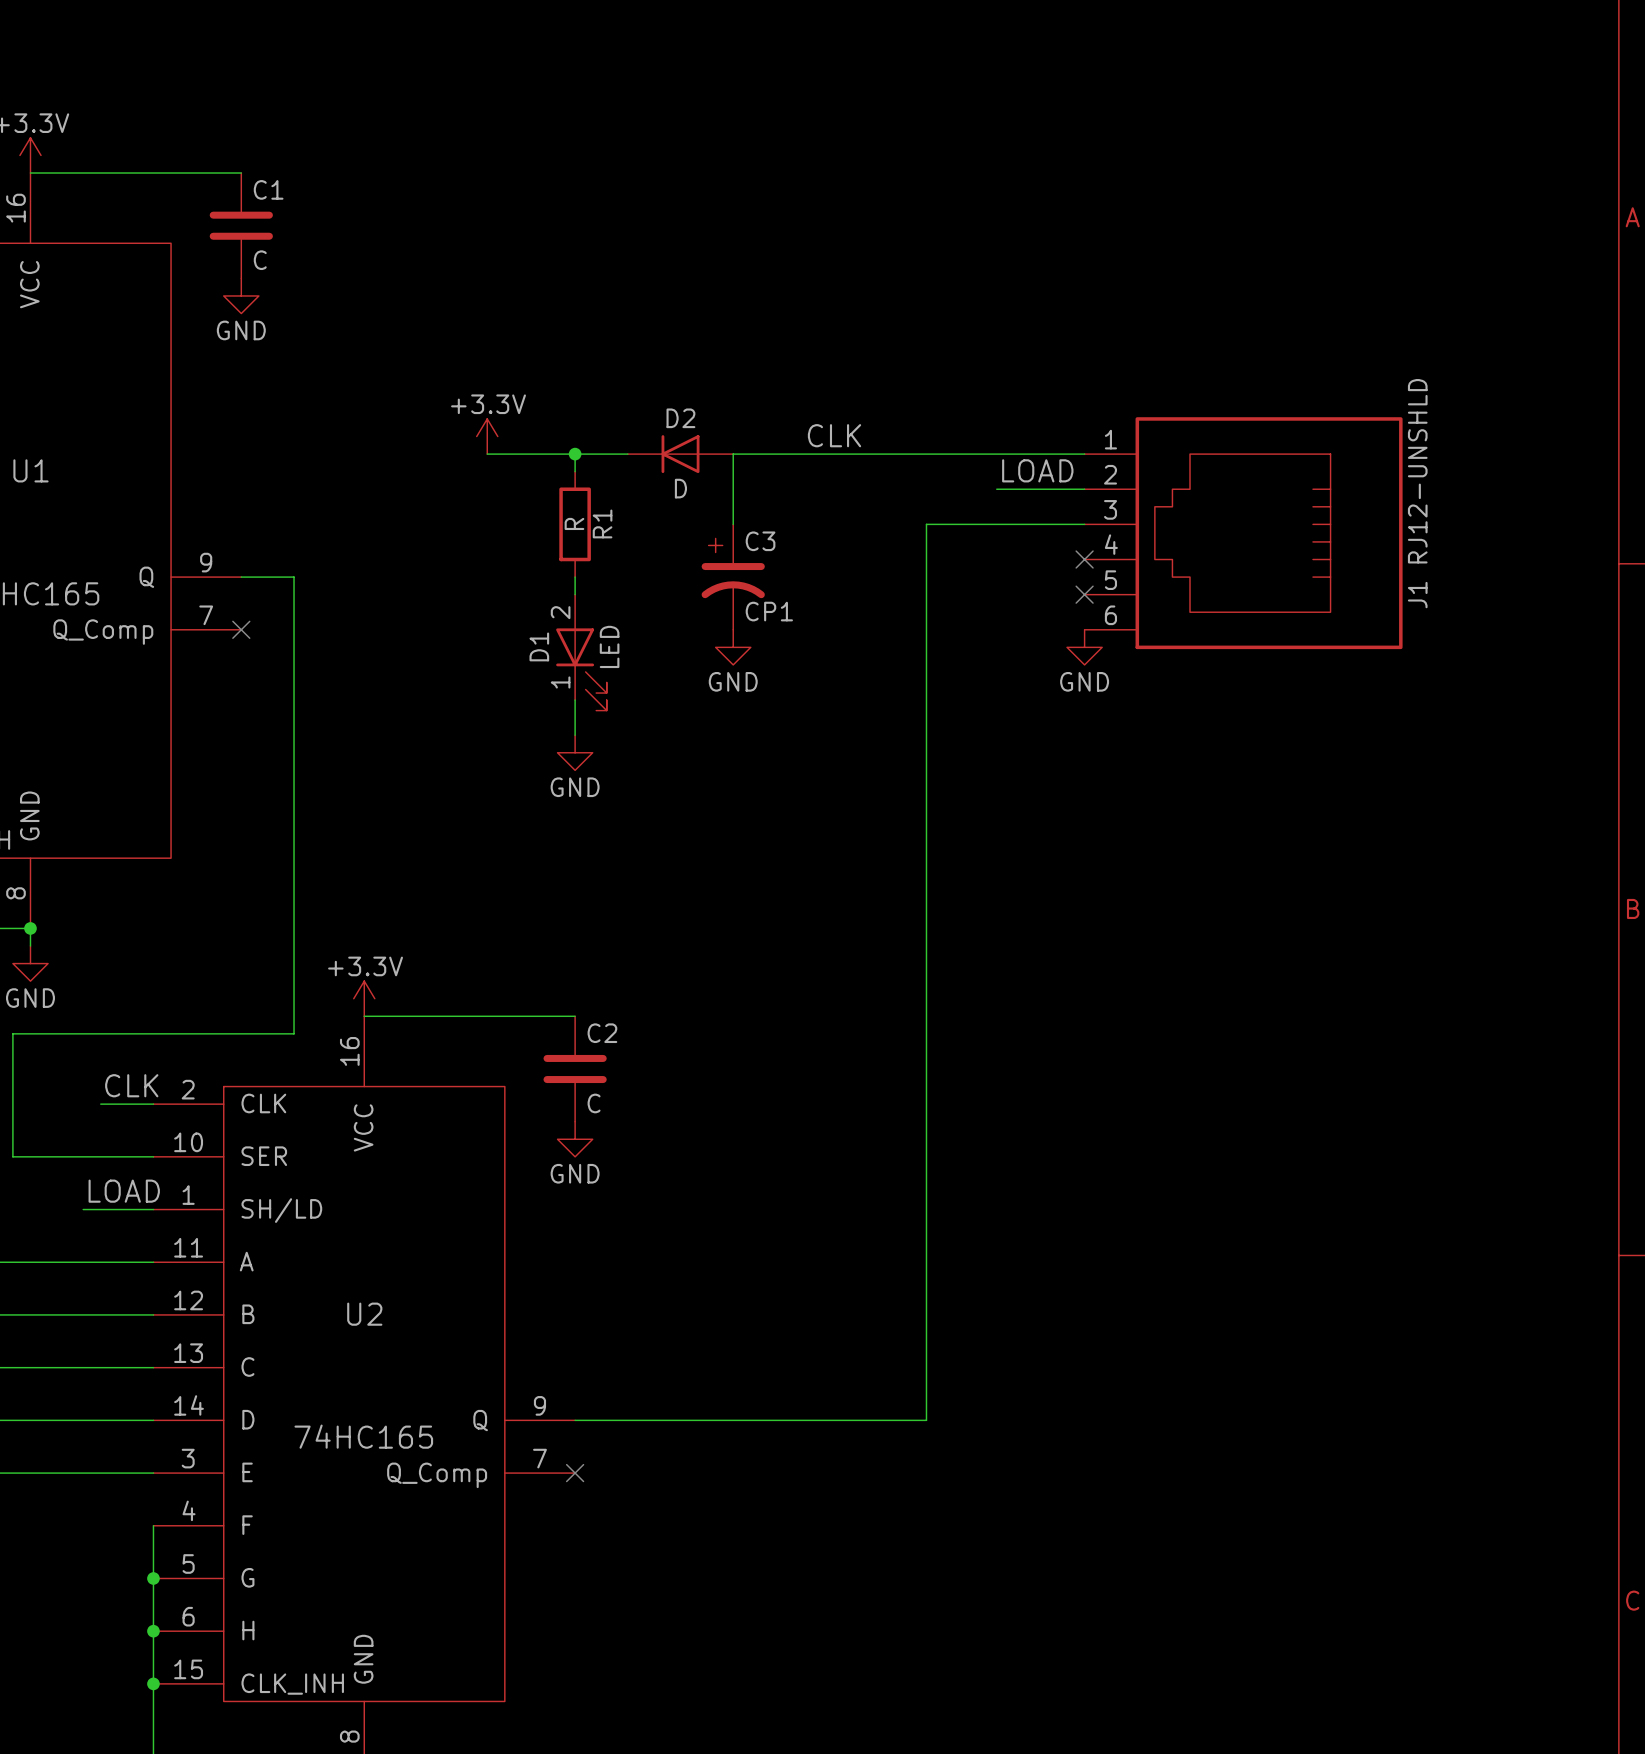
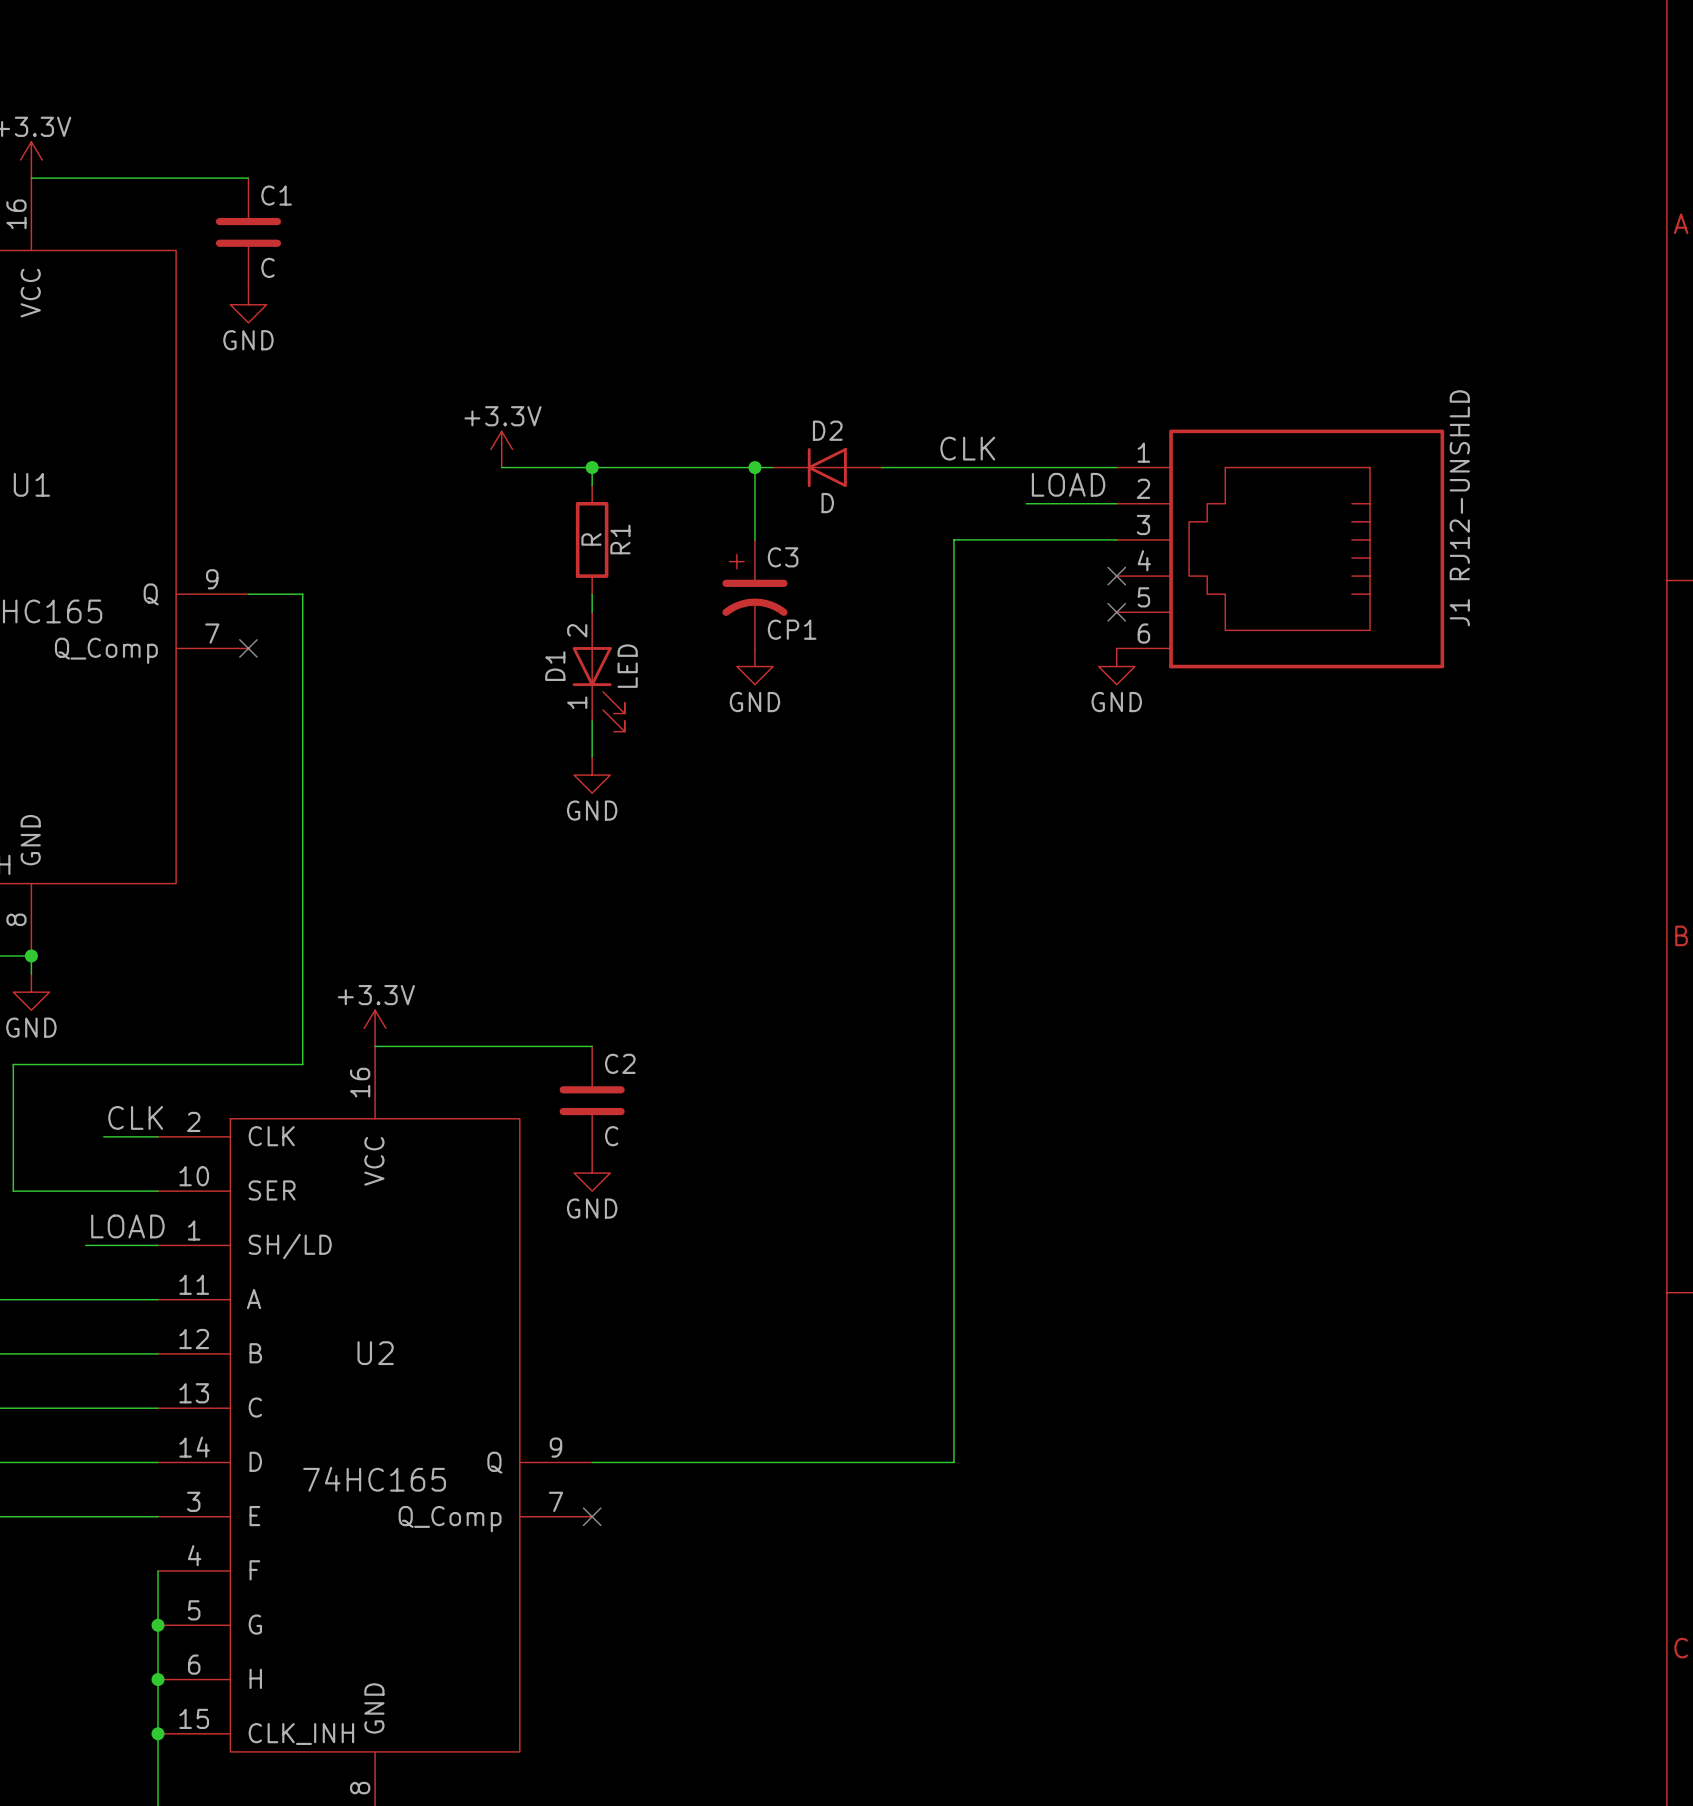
label position: CLK (834, 435) -> CLK (967, 448)
D2 position: (680, 454) -> (827, 467)
junction: none -> (754, 467)

